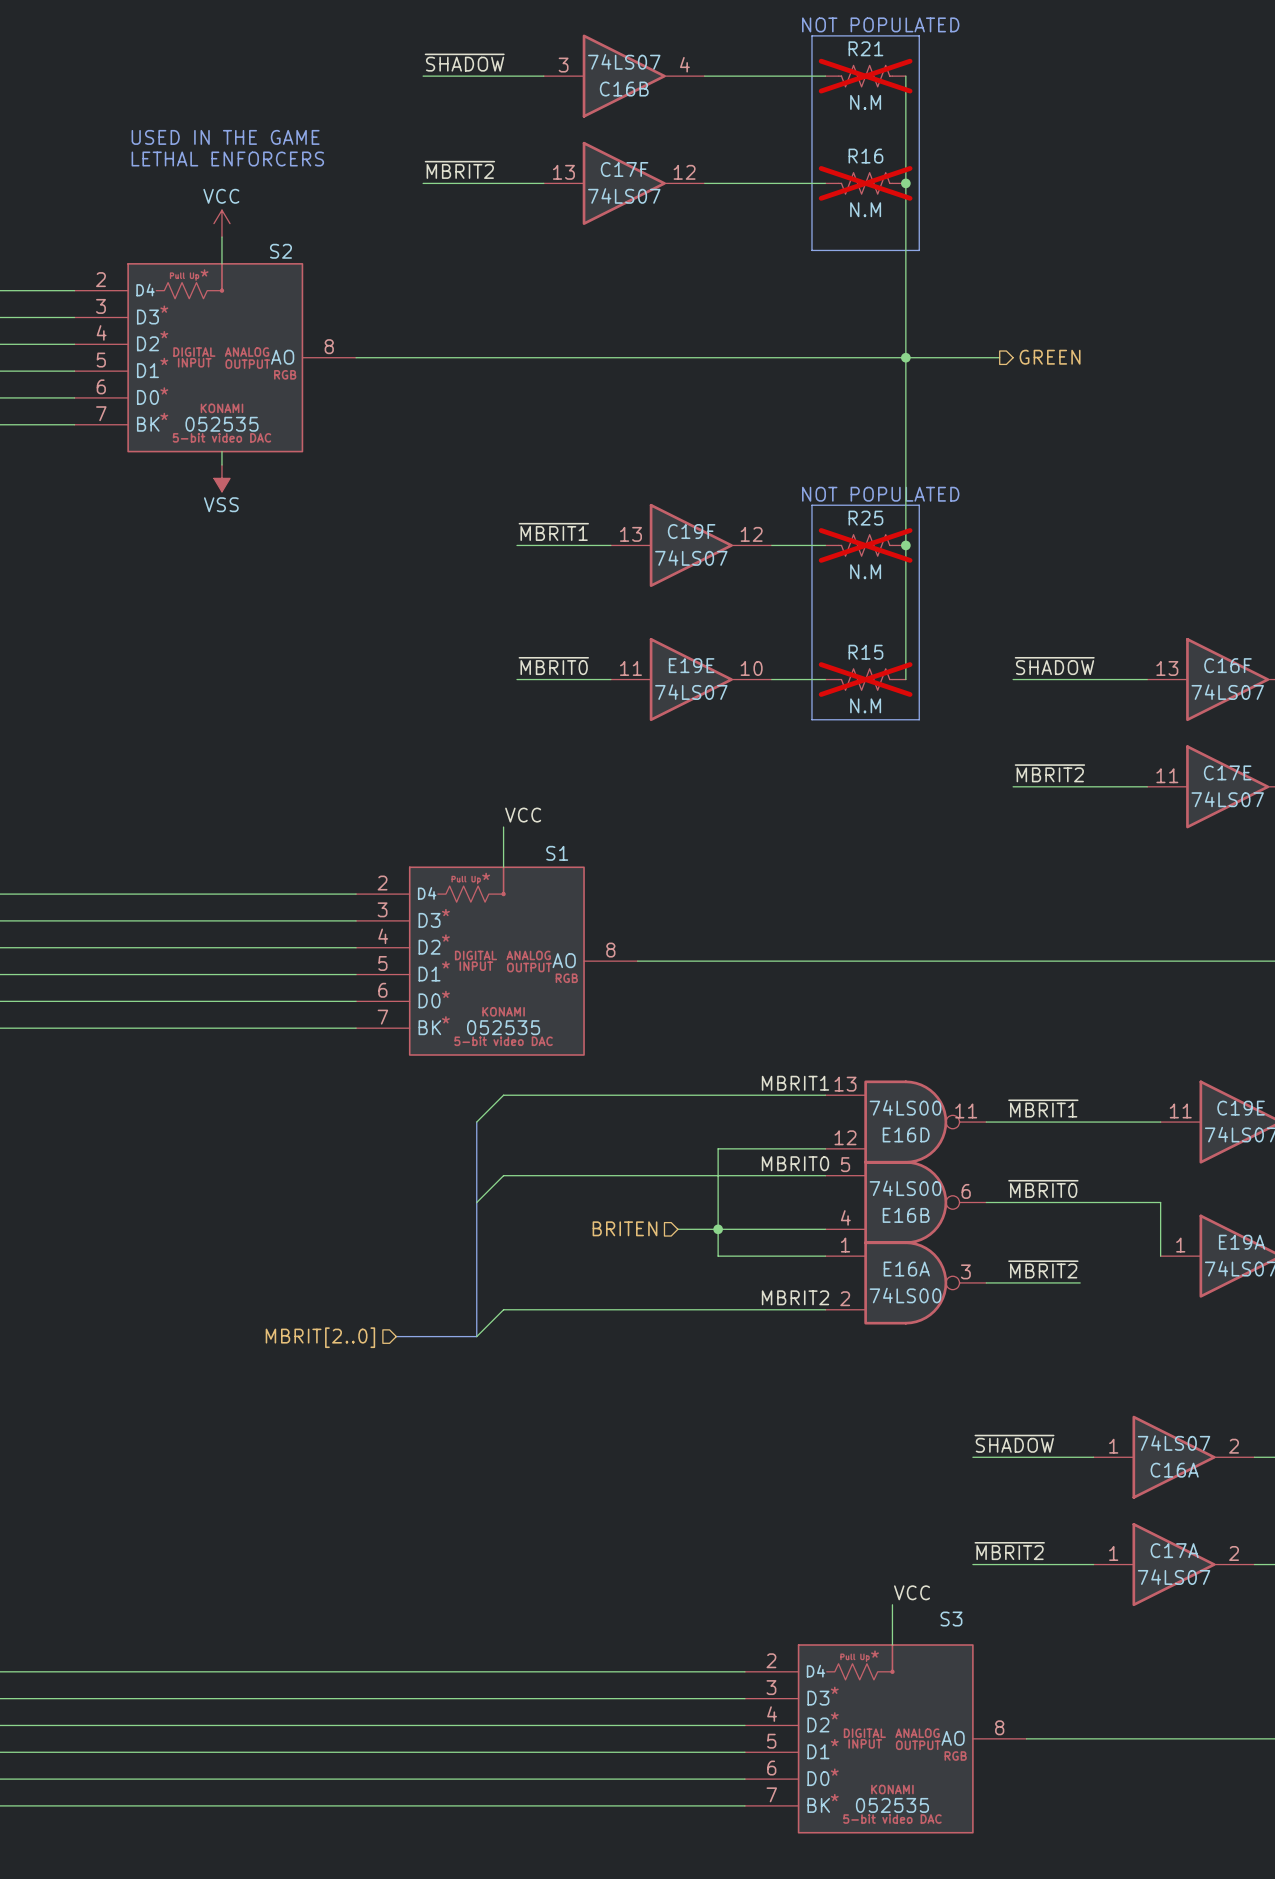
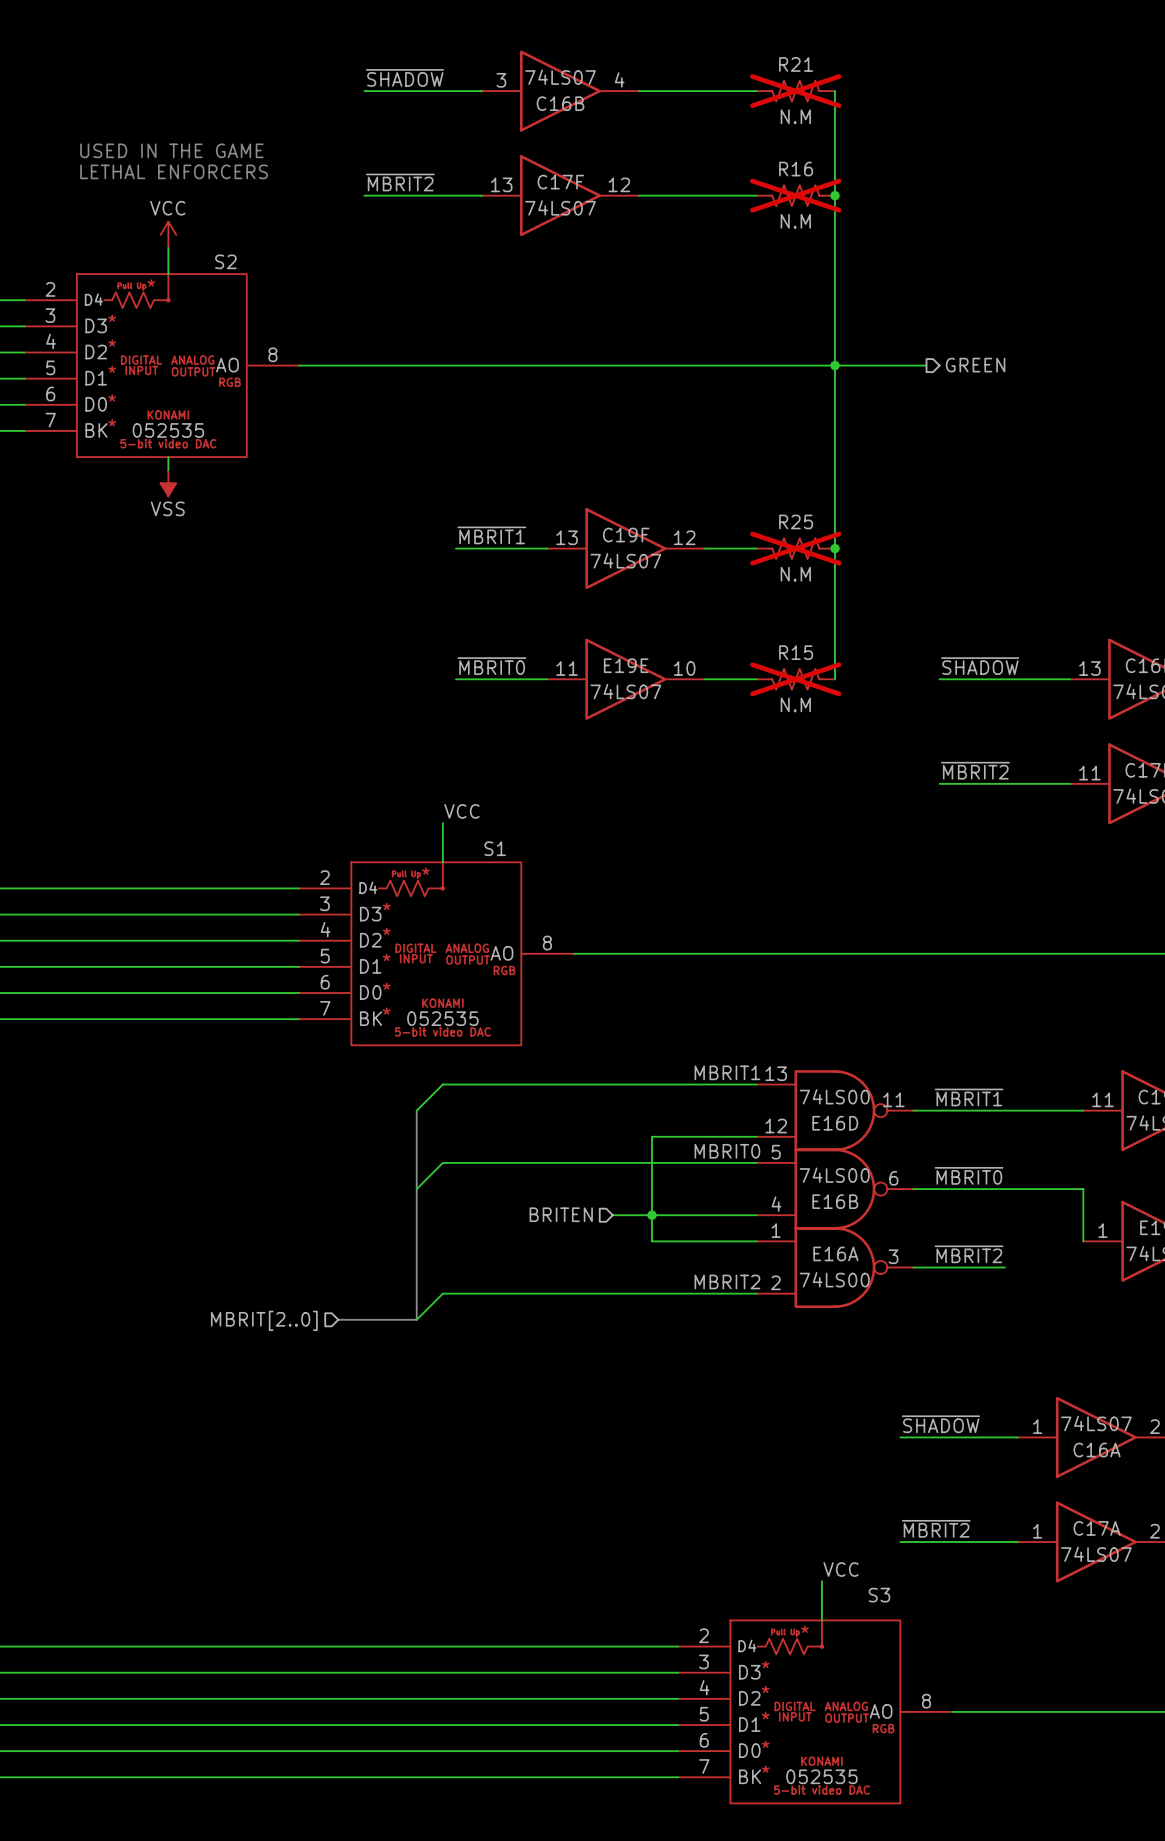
text: NOT POPULATED (880, 24) -> none
line: (811, 35) (811, 250) (919, 250) (919, 35) (811, 35) -> none
text: NOT POPULATED (880, 494) -> none
line: (811, 505) (811, 719) (919, 719) (919, 505) (811, 505) -> none

